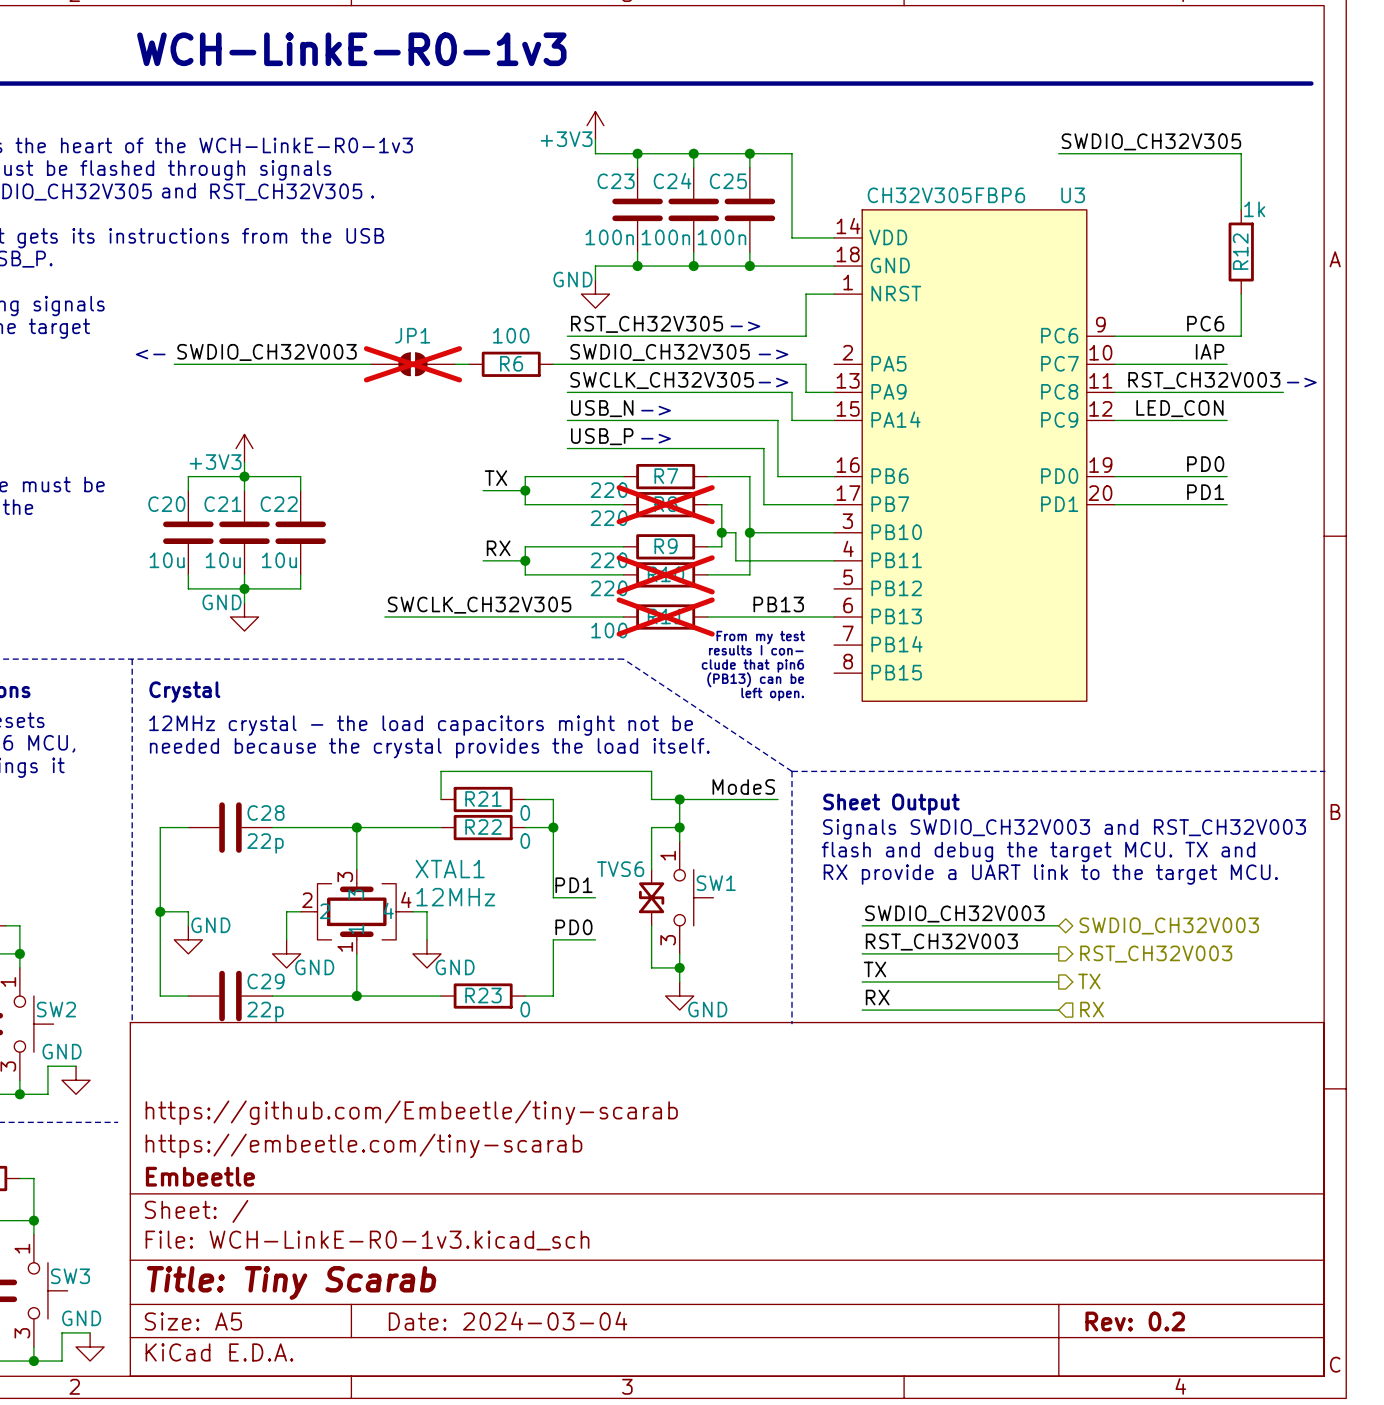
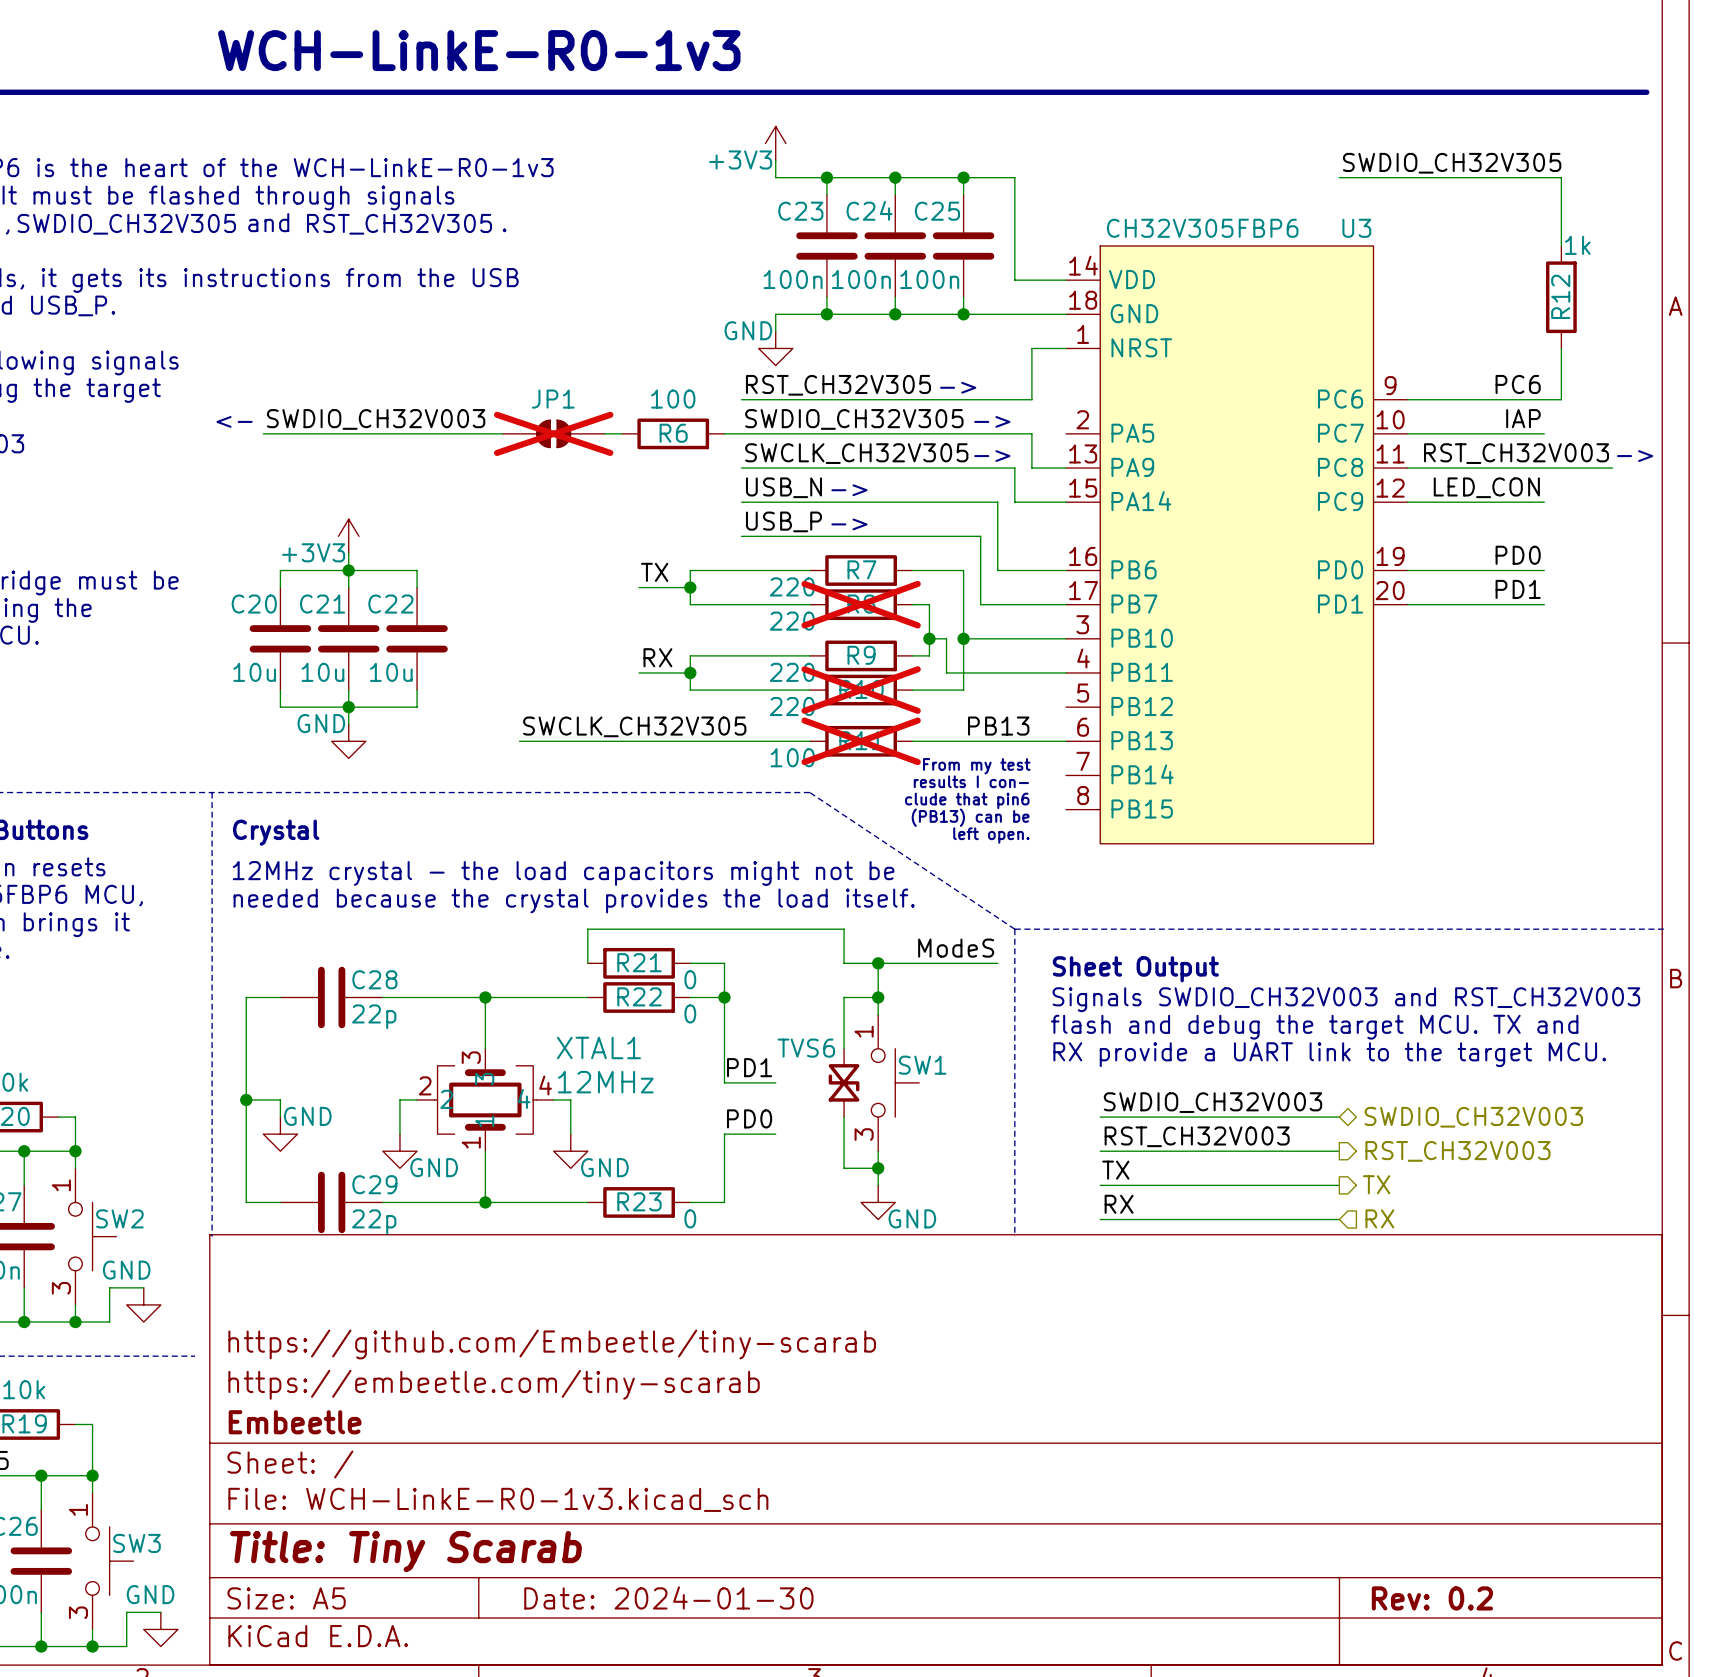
title block: Date: 2024-03-04 (508, 1321) -> Date: 2024-01-30 (668, 1597)

